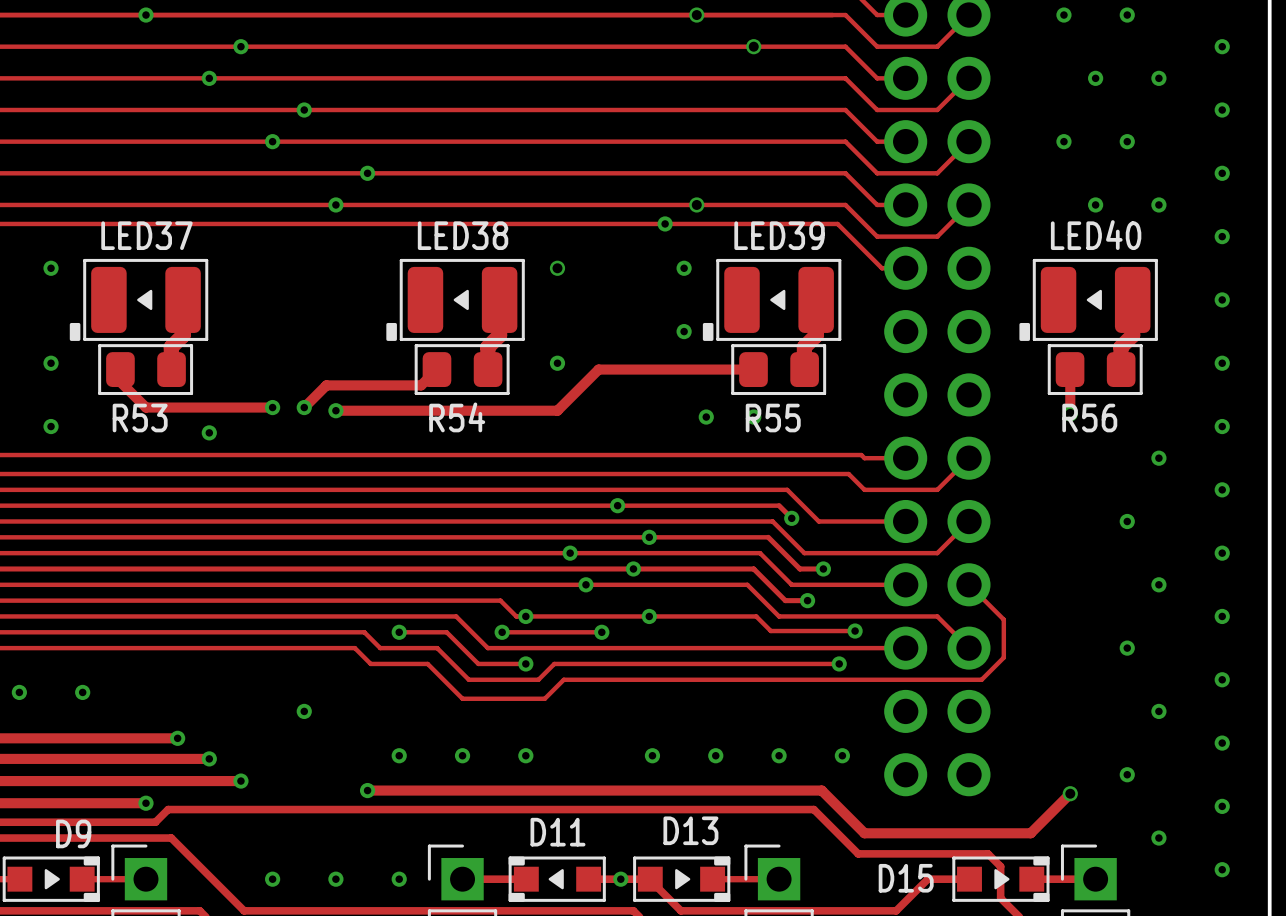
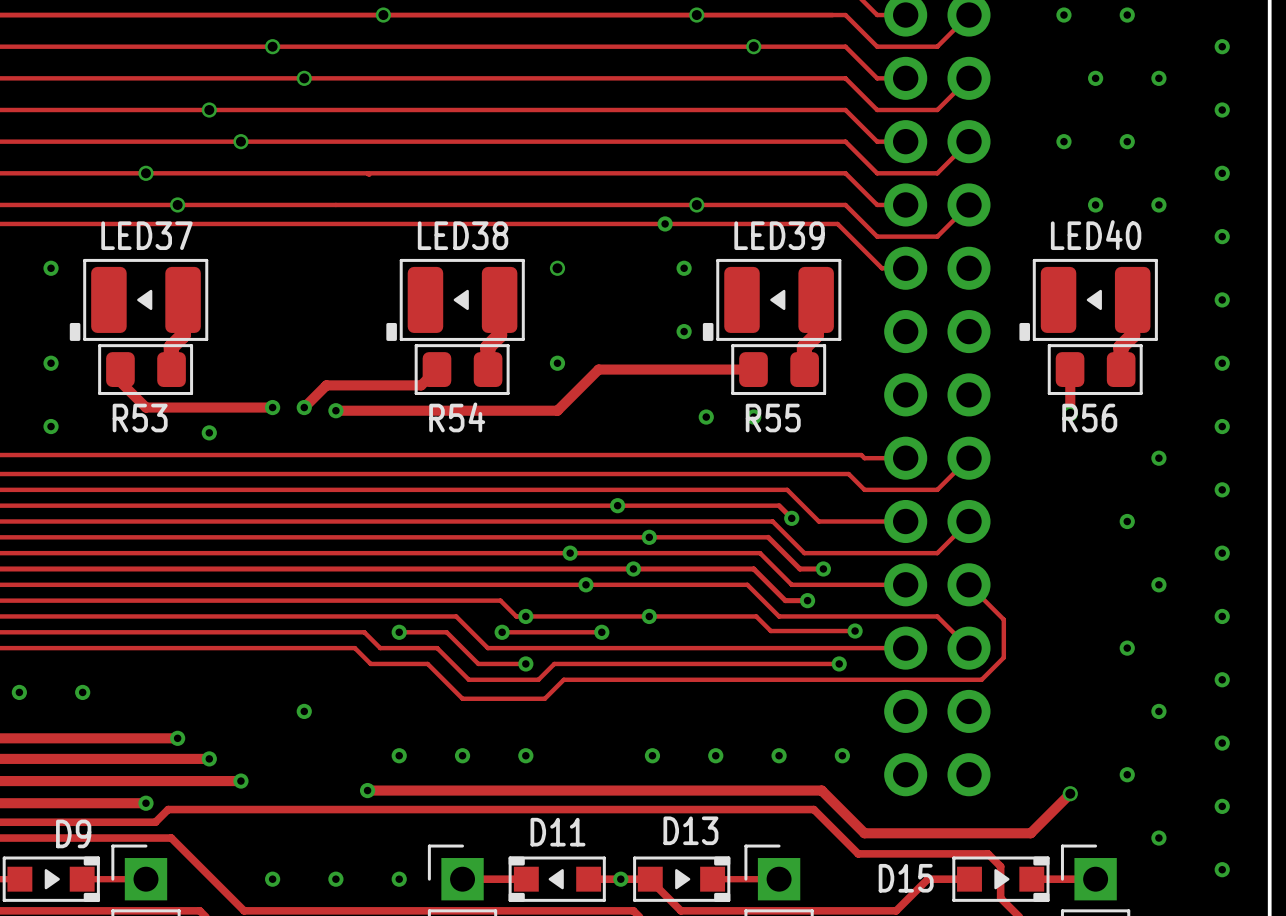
via: (145, 15) -> none
via: none -> (383, 15)
via: (240, 46) -> none
via: none -> (272, 46)
via: (209, 78) -> none
via: none -> (304, 78)
via: none -> (209, 110)
via: (304, 110) -> none
via: none -> (240, 141)
via: (272, 141) -> none
via: none -> (145, 173)
via: (367, 173) -> none
via: none -> (177, 204)
via: (335, 204) -> none

